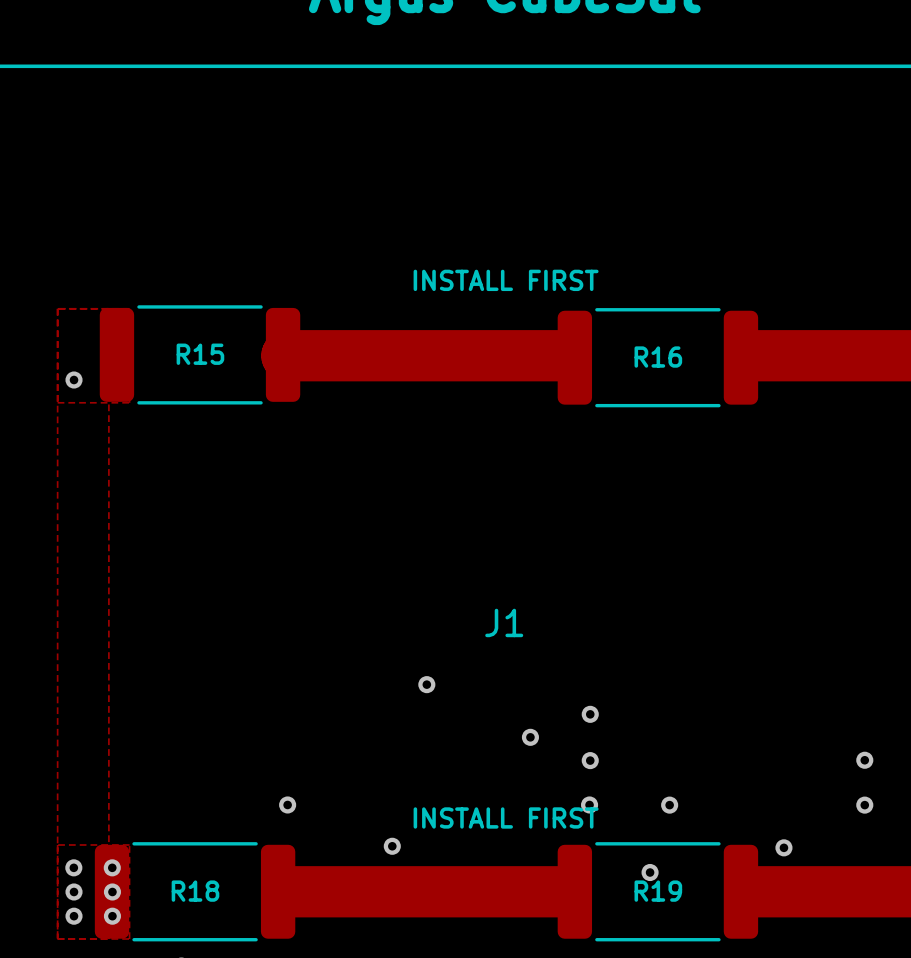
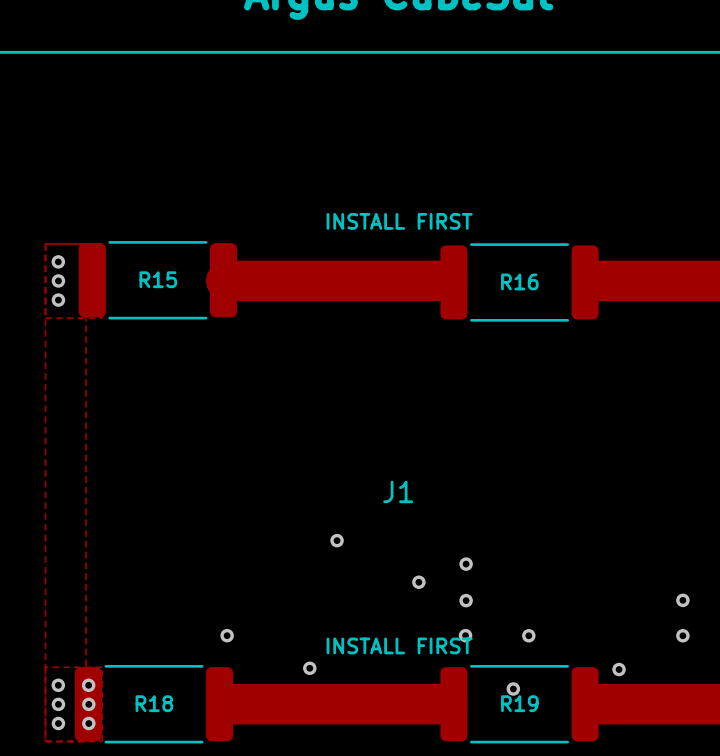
via: none -> (58, 261)
via: none -> (58, 280)

